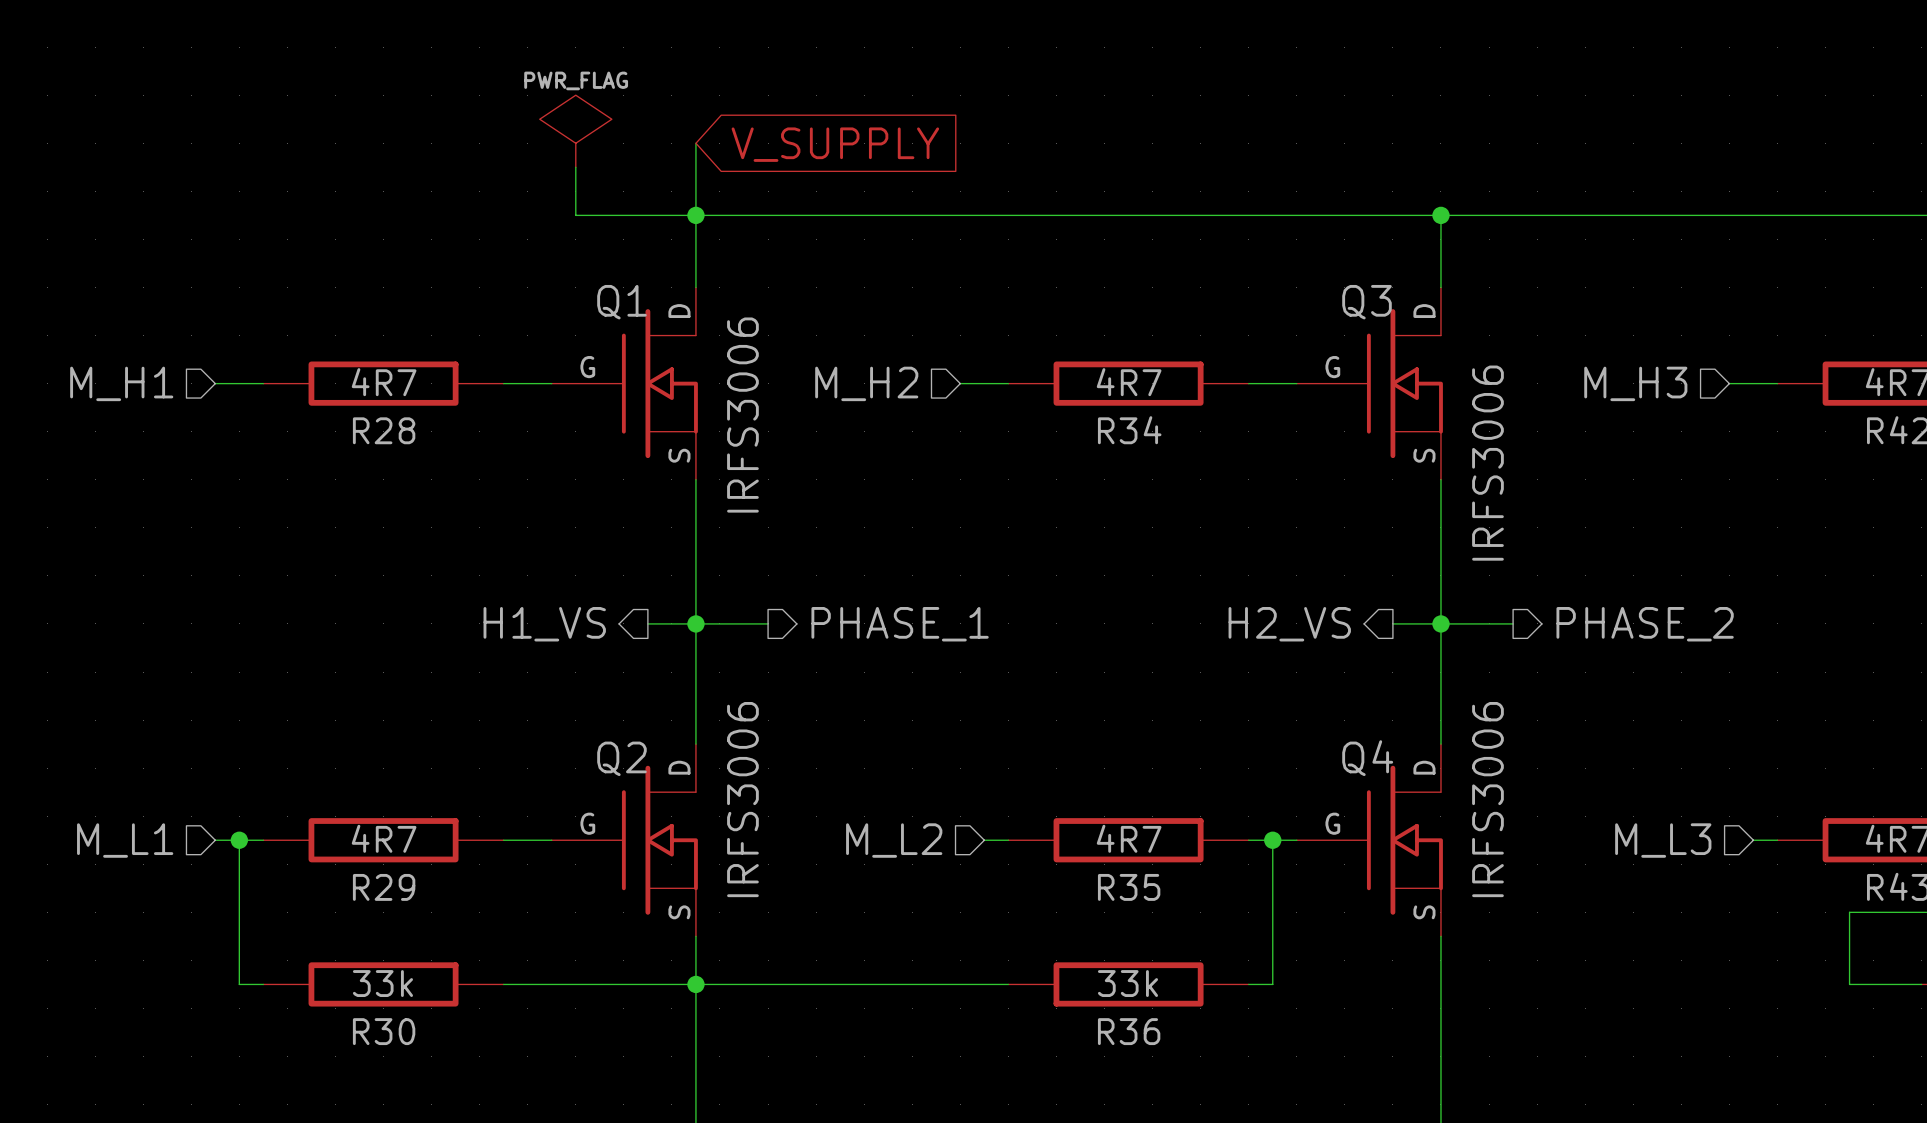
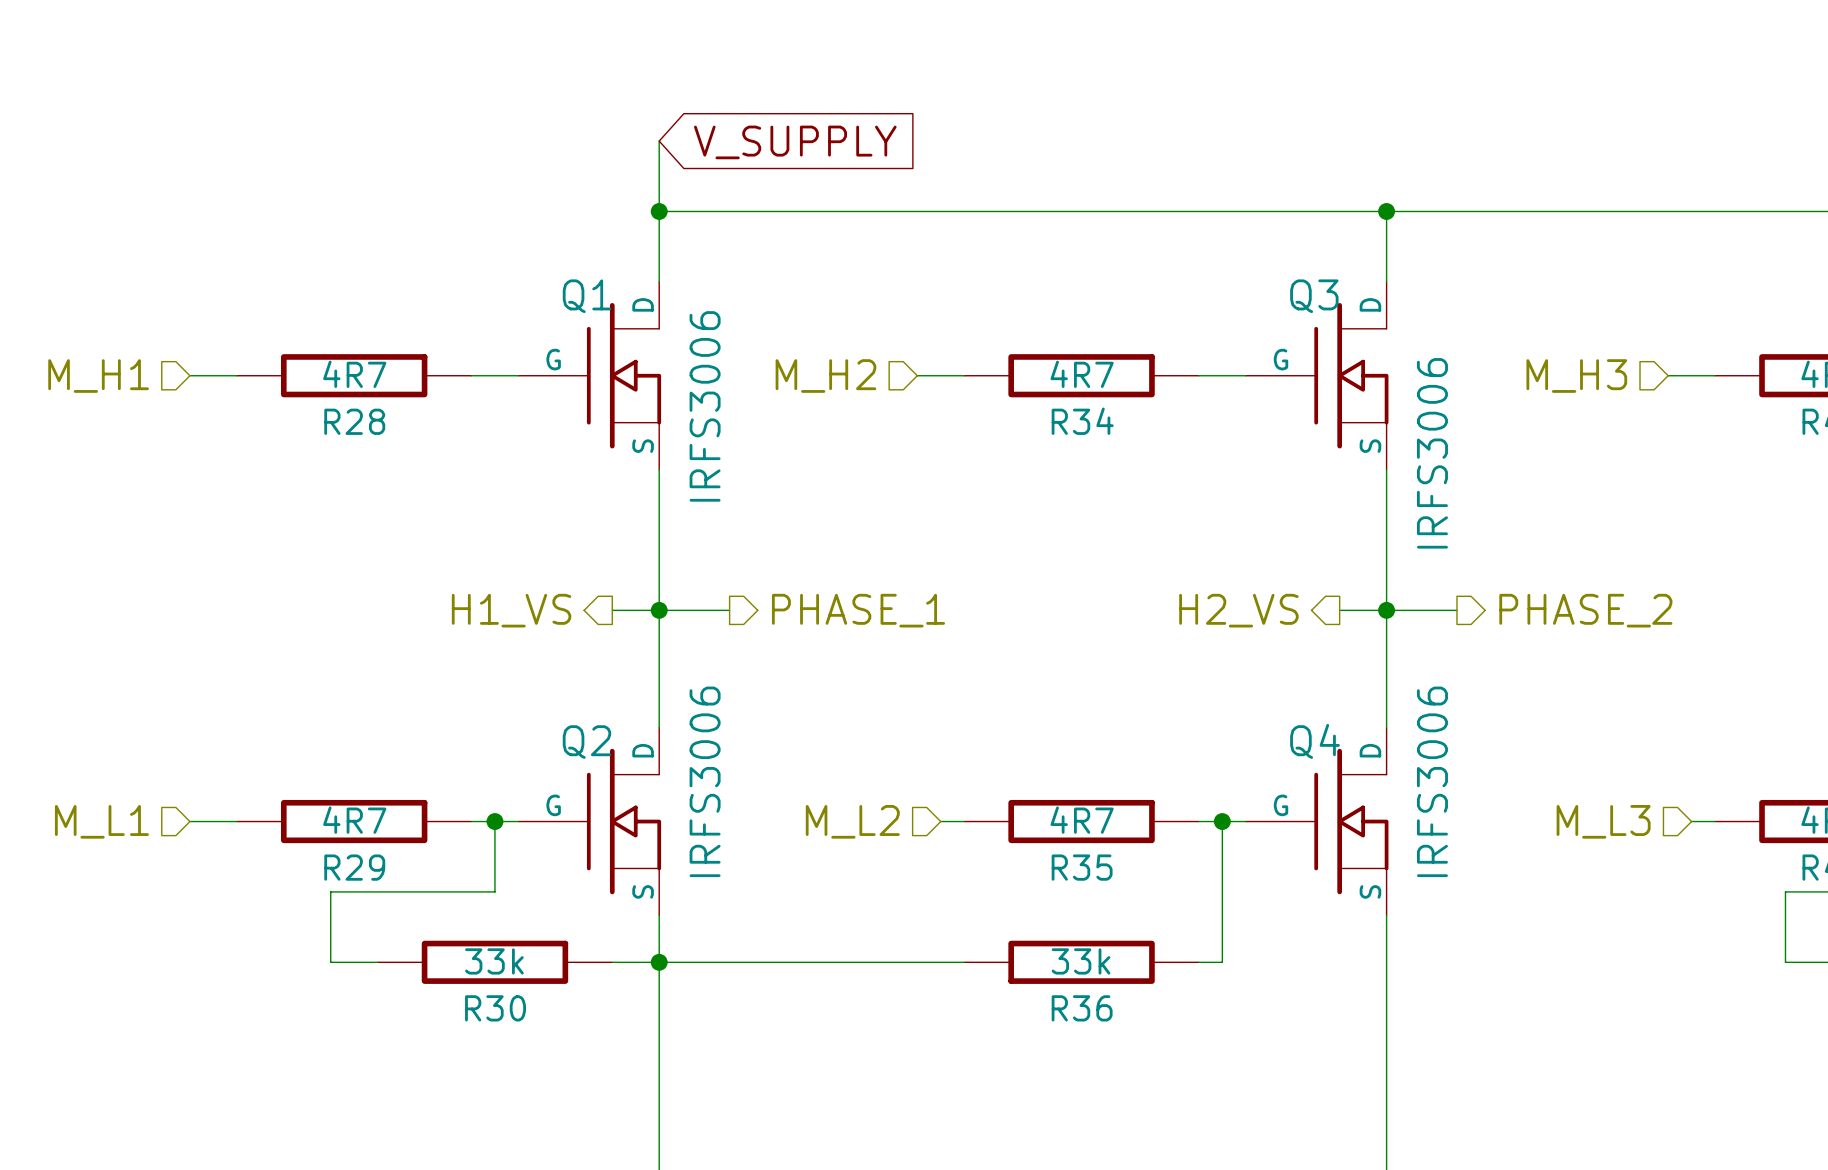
power symbol: PWR_FLAG (575, 131) -> none
wire: (575, 167) (575, 215) (695, 215) -> none
wire: (239, 840) (239, 984) (263, 984) -> none
junction: (239, 840) -> none
wire: none -> (494, 821) (494, 891) (330, 891) (330, 962) (377, 962)
junction: none -> (494, 821)
R30 position: (383, 984) -> (494, 962)
wire: (503, 984) (647, 984) -> none

